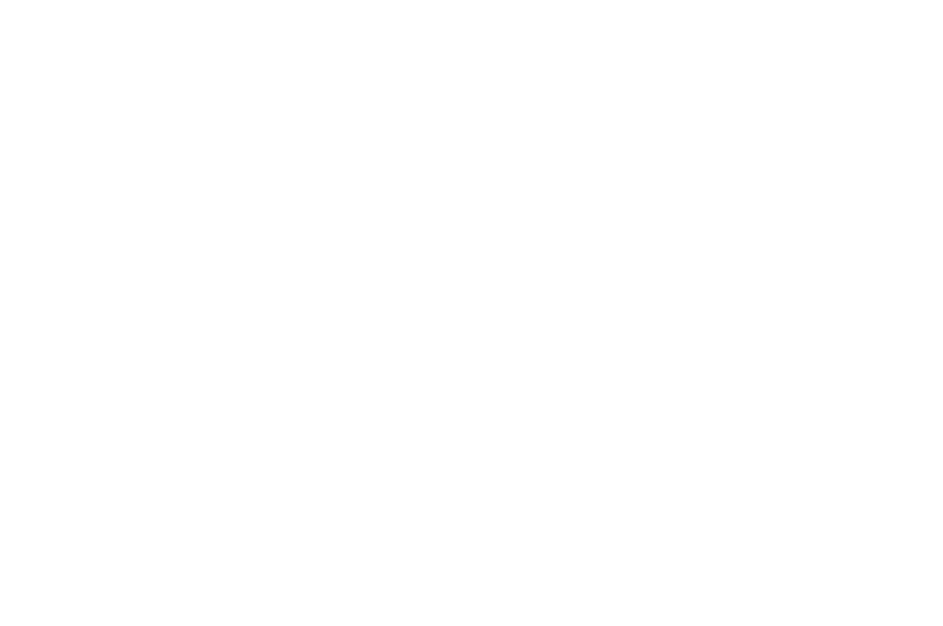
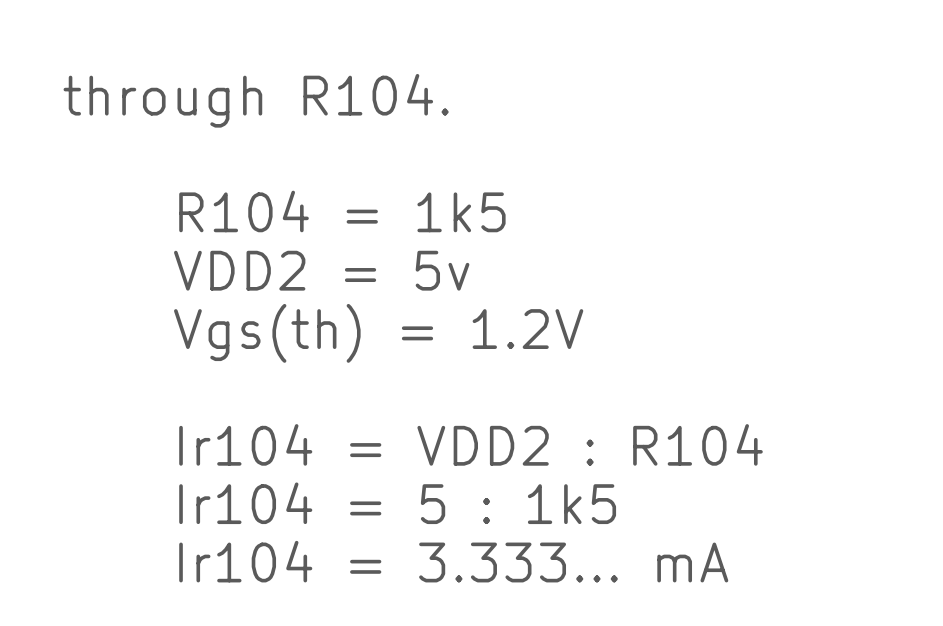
text: none -> through R104. (256, 100)
text: none -> R104 = 1k5 (342, 211)
text: none -> VDD2 = 5v (321, 270)
text: none -> Vgs(th) = 1.2V (378, 333)
text: none -> Ir104 = VDD2 : R104 (471, 444)
text: none -> Ir104 = 5 : 1k5 (397, 503)
text: none -> Ir104 = 3.333... mA (453, 561)

